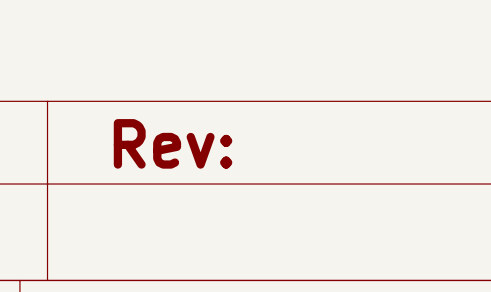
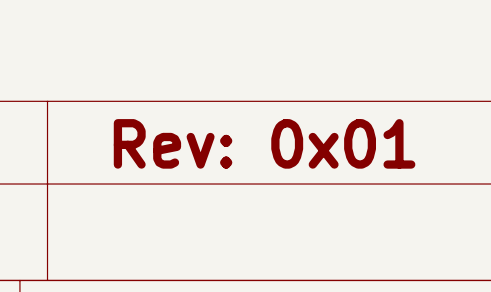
title block: Rev: (173, 143) -> Rev: 0x01 (264, 143)

